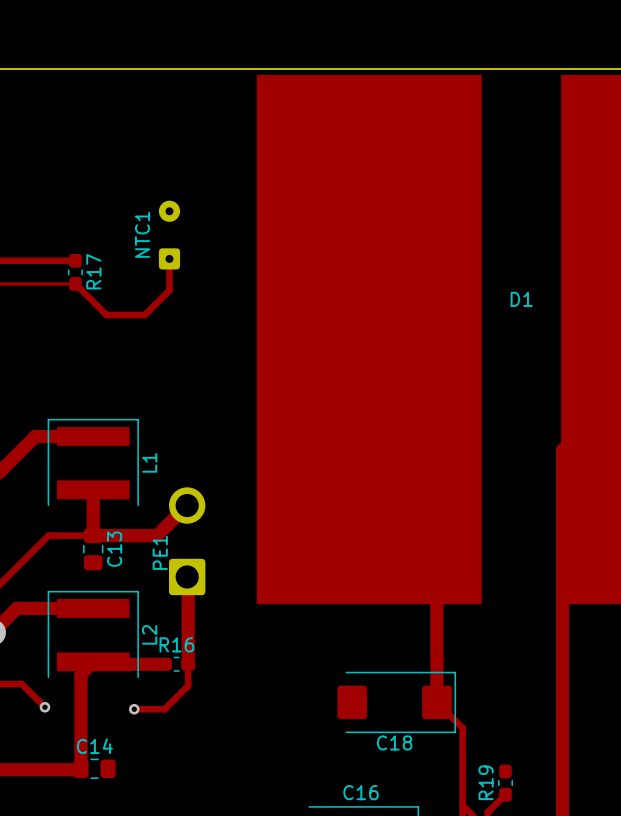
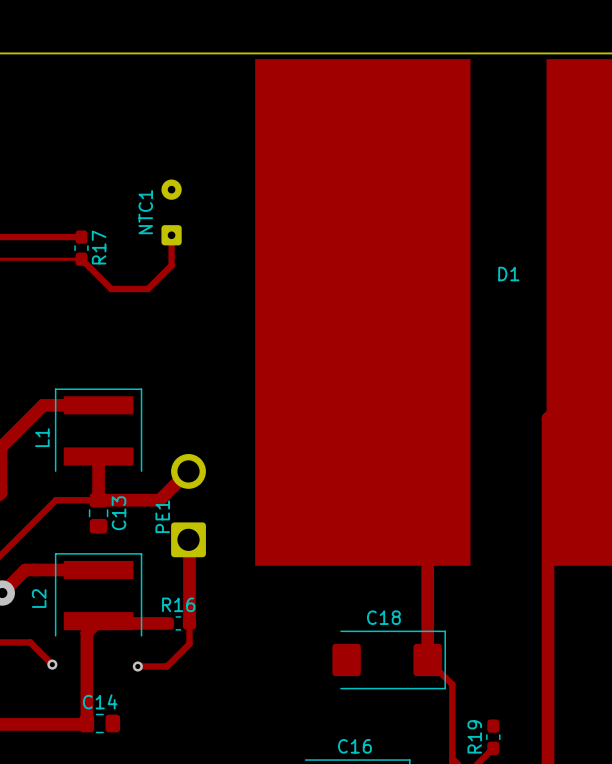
L1 name position: L1 (149, 462) -> L1 (42, 437)
L2 name position: L2 (149, 634) -> L2 (39, 598)
C18 name position: C18 (394, 742) -> C18 (383, 617)

